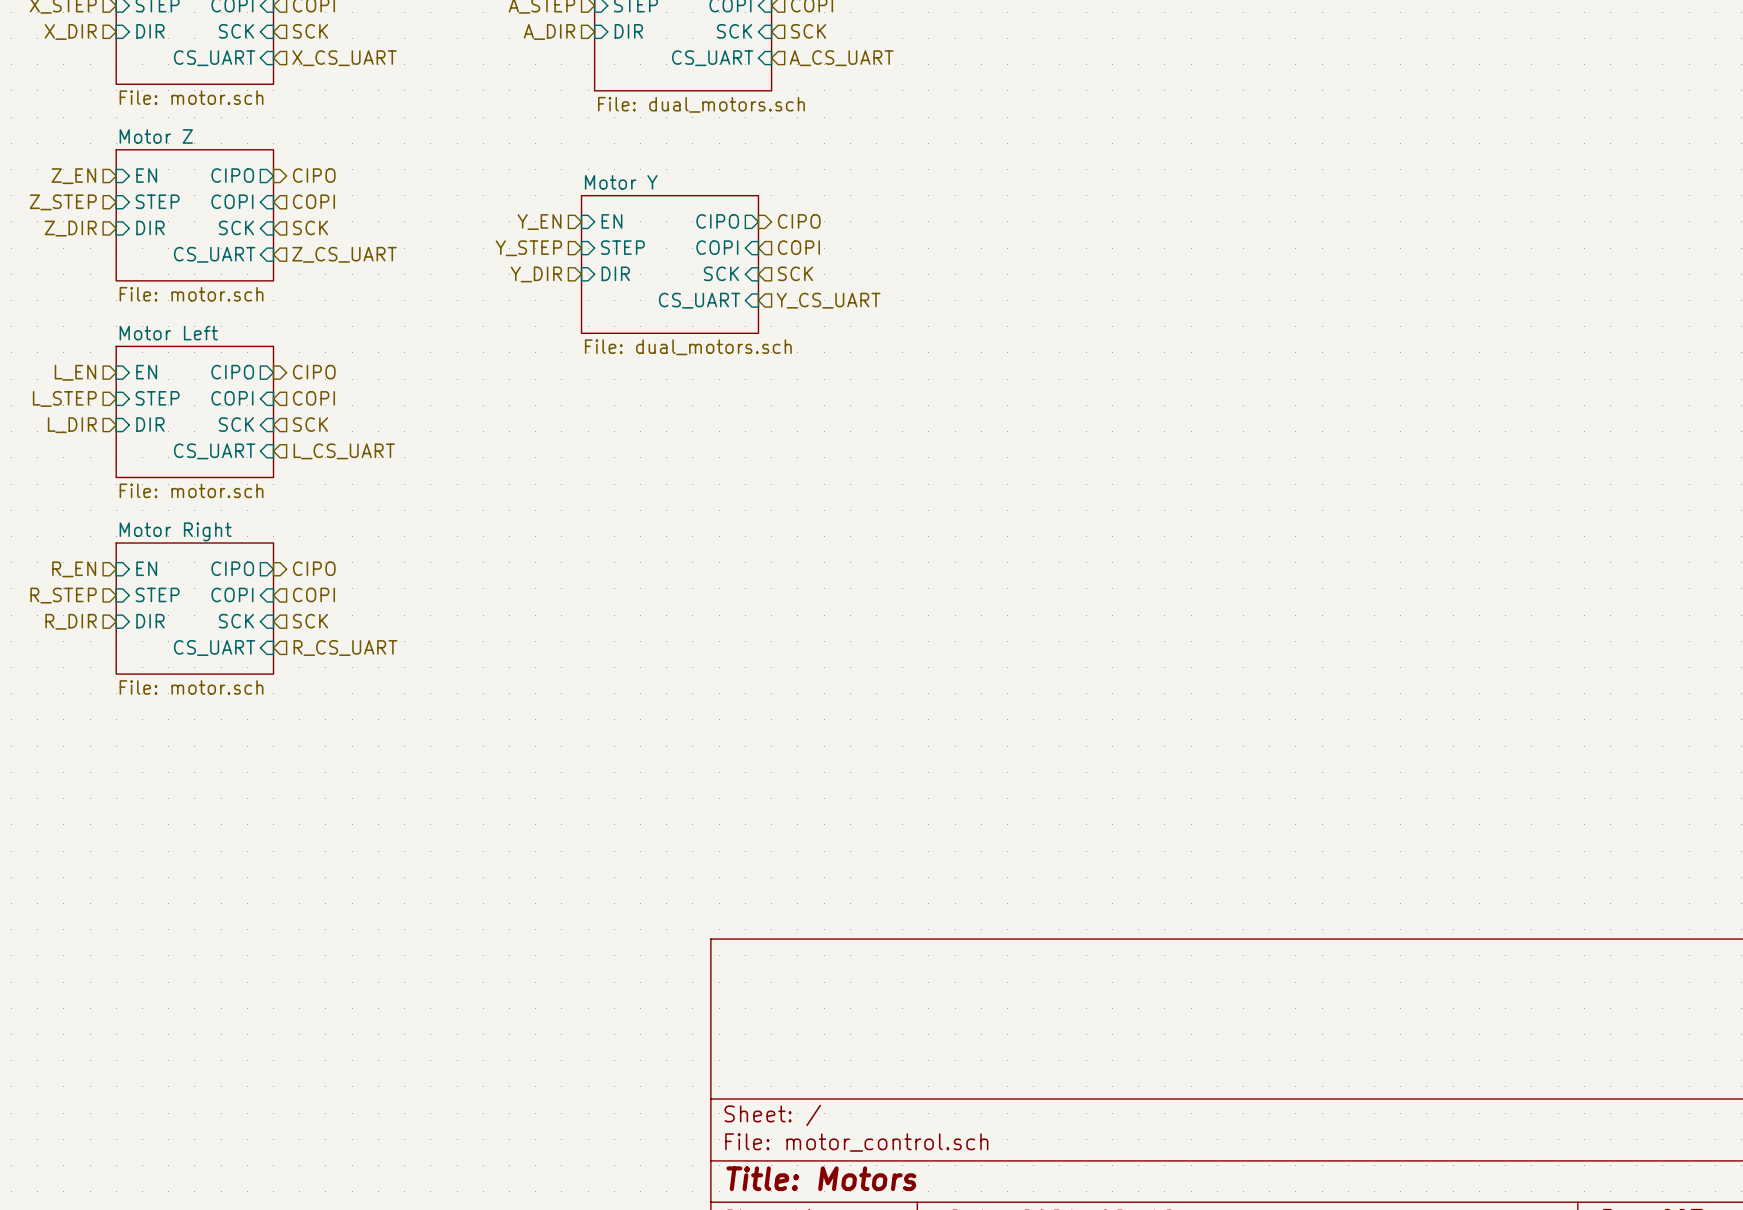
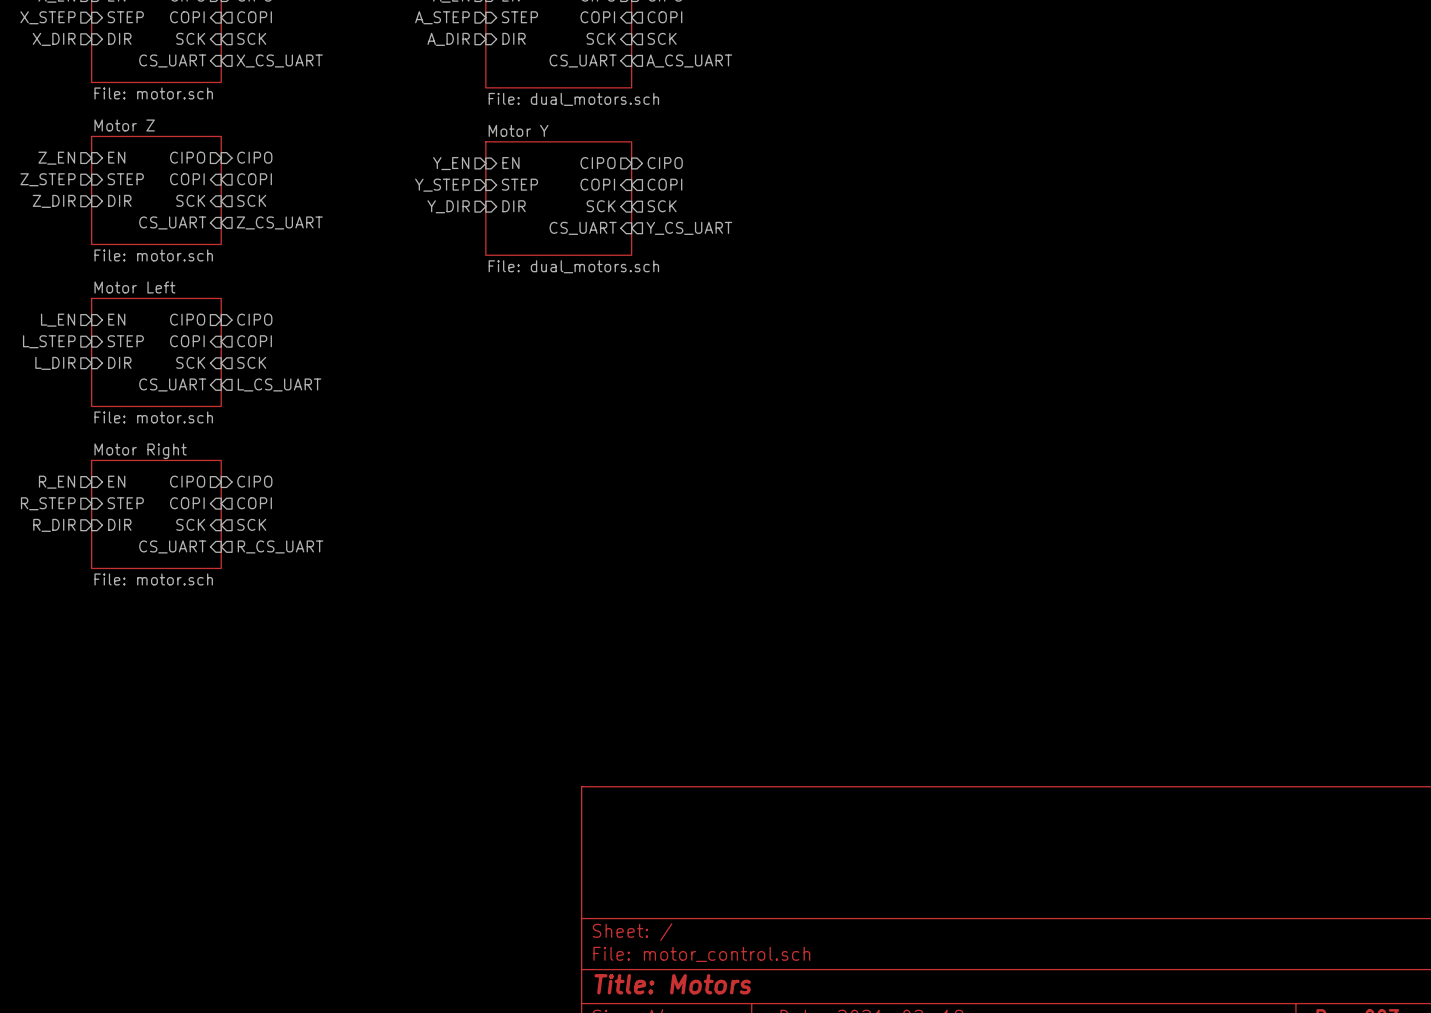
sheet pin position: EN (611, 221) -> EN (510, 163)
sheet pin position: CIPO (717, 221) -> CIPO (598, 163)
hierarchical label position: CIPO (799, 221) -> CIPO (665, 163)
hierarchical label position: Y_EN (539, 222) -> Y_EN (451, 163)
sheet pin position: STEP (622, 247) -> STEP (519, 184)
sheet pin position: COPI (717, 247) -> COPI (597, 184)
hierarchical label position: COPI (798, 247) -> COPI (664, 184)
hierarchical label position: Y_STEP (528, 248) -> Y_STEP (442, 185)
sheet Motor Y position: (669, 264) -> (558, 198)
sheet pin position: DIR (615, 273) -> DIR (514, 206)
sheet pin position: SCK (721, 273) -> SCK (601, 206)
hierarchical label position: SCK (795, 273) -> SCK (662, 206)
hierarchical label position: Y_DIR (536, 274) -> Y_DIR (448, 206)
sheet pin position: CS_UART (699, 300) -> CS_UART (583, 228)
hierarchical label position: Y_CS_UART (828, 300) -> Y_CS_UART (689, 228)

